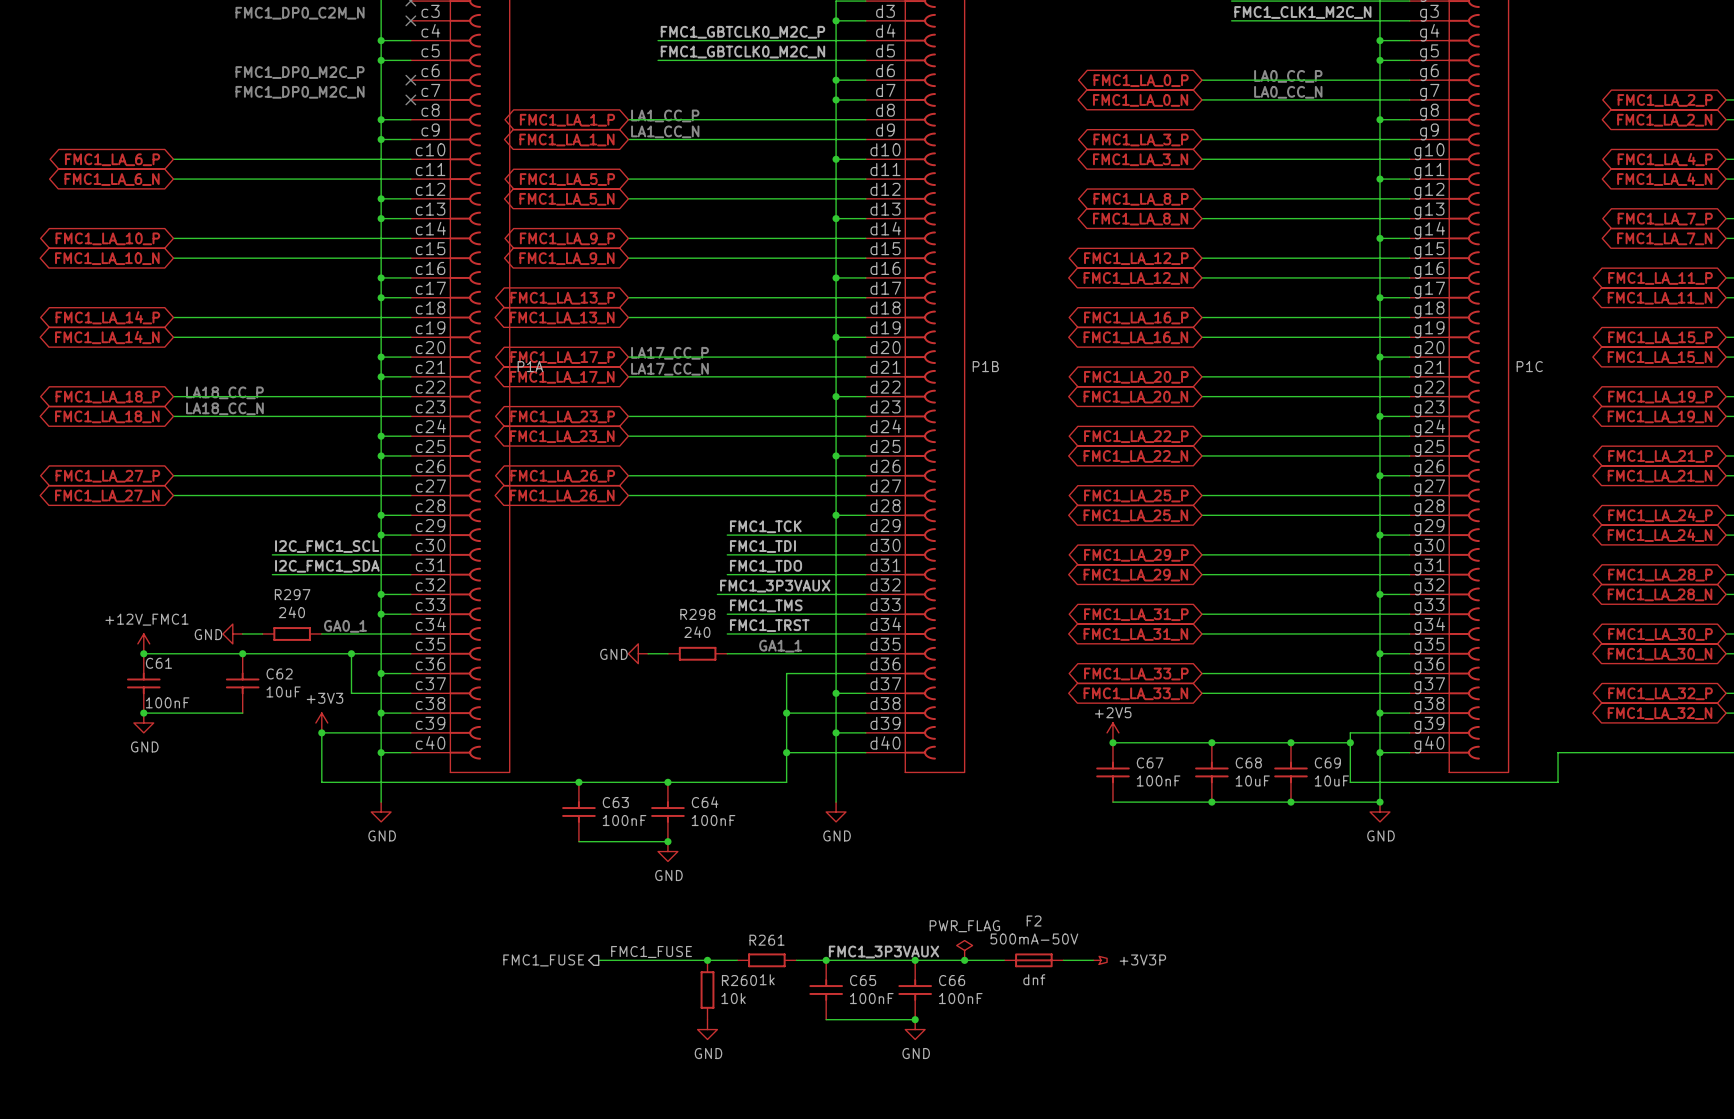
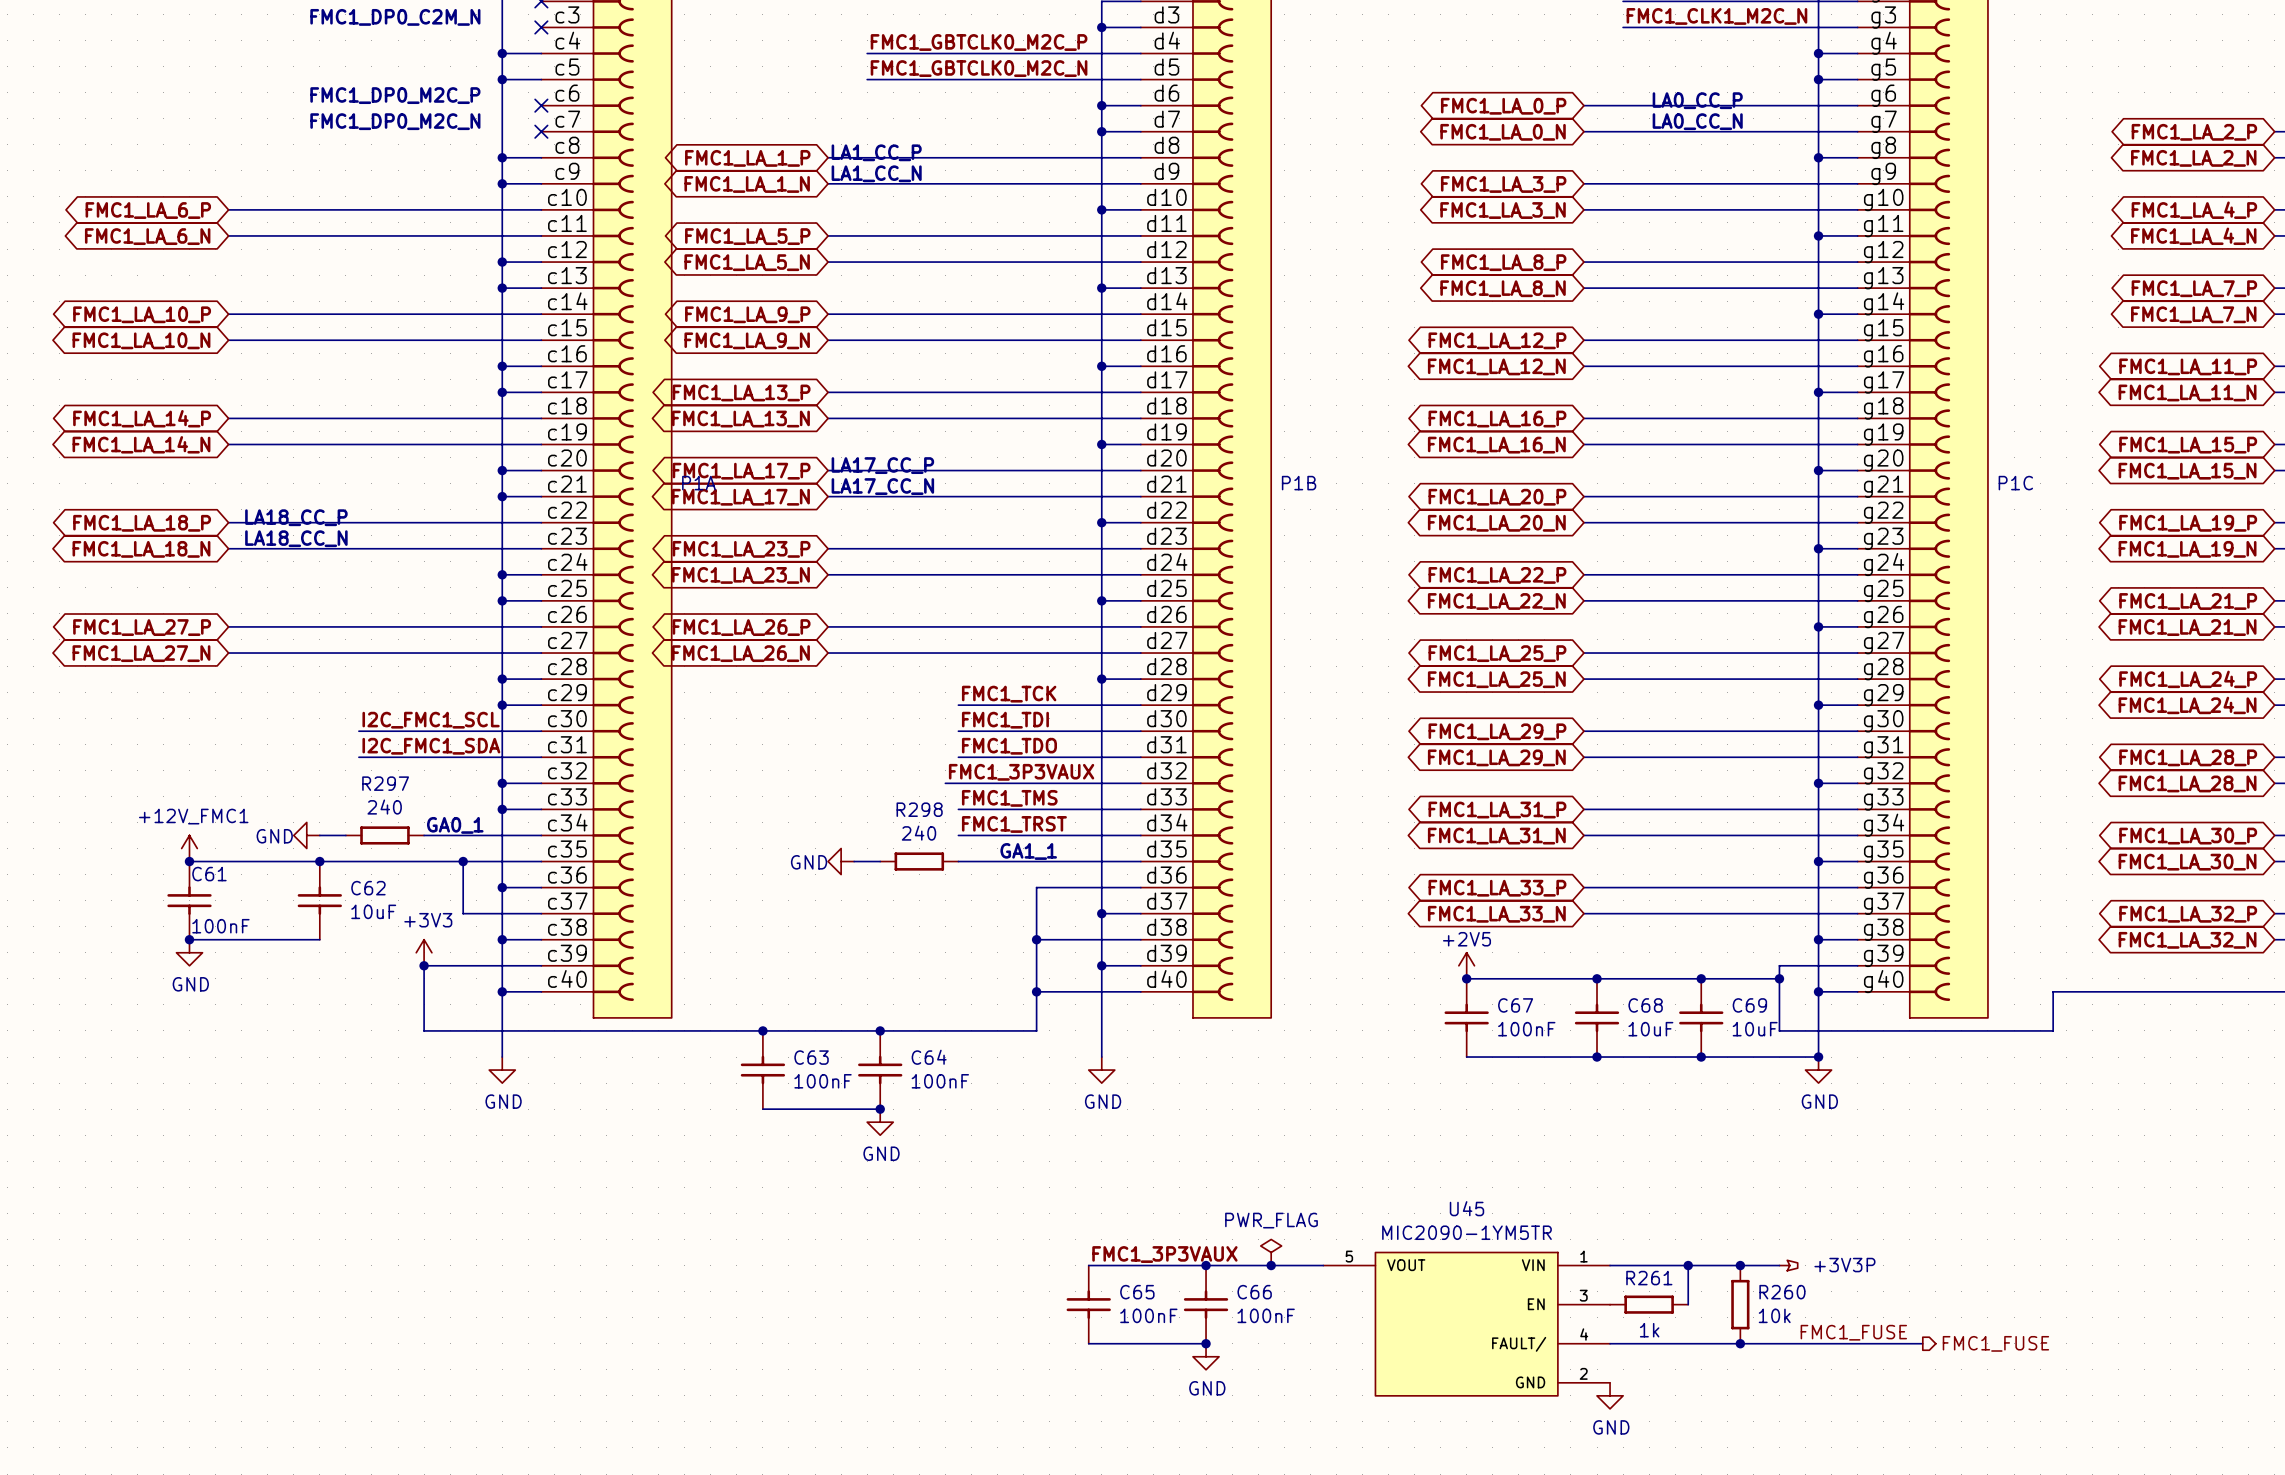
label: FMC1_FUSE (651, 951) -> none
hierarchical label: FMC1_FUSE (543, 960) -> none
wire: (598, 960) (737, 960) -> none
junction: (707, 960) -> none
R261 position: (766, 960) -> (1649, 1304)
wire: (796, 960) (826, 960) -> none
junction: (826, 960) -> none
F2: (1033, 960) -> none
power symbol: +3V3P (1100, 960) -> none
wire: none -> (1610, 1265) (1779, 1265)
wire: none -> (1688, 1265) (1688, 1304)
junction: none -> (1688, 1265)
junction: none -> (1740, 1265)
power symbol: none -> +3V3P (1788, 1265)
R260 position: (707, 990) -> (1740, 1304)
U45: none -> MIC2090-1YM5TR (1466, 1324)
label: none -> FMC1_FUSE (1853, 1332)
wire: none -> (1610, 1343) (1922, 1343)
junction: none -> (1740, 1343)
hierarchical label: none -> FMC1_FUSE (1995, 1343)
power symbol: GND (707, 1029) -> none
power symbol: none -> GND (1610, 1395)

